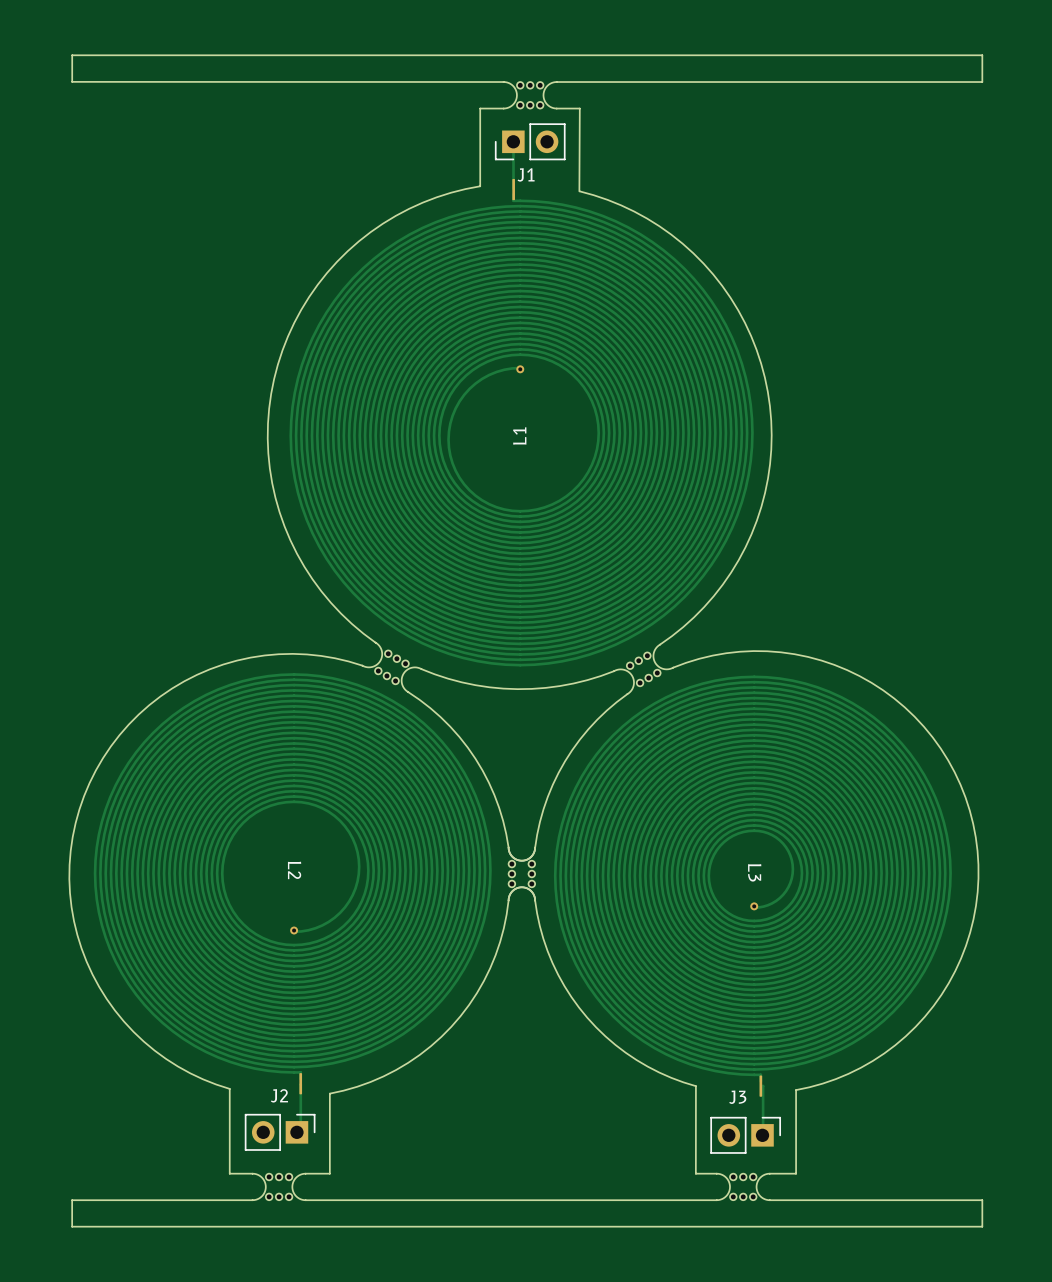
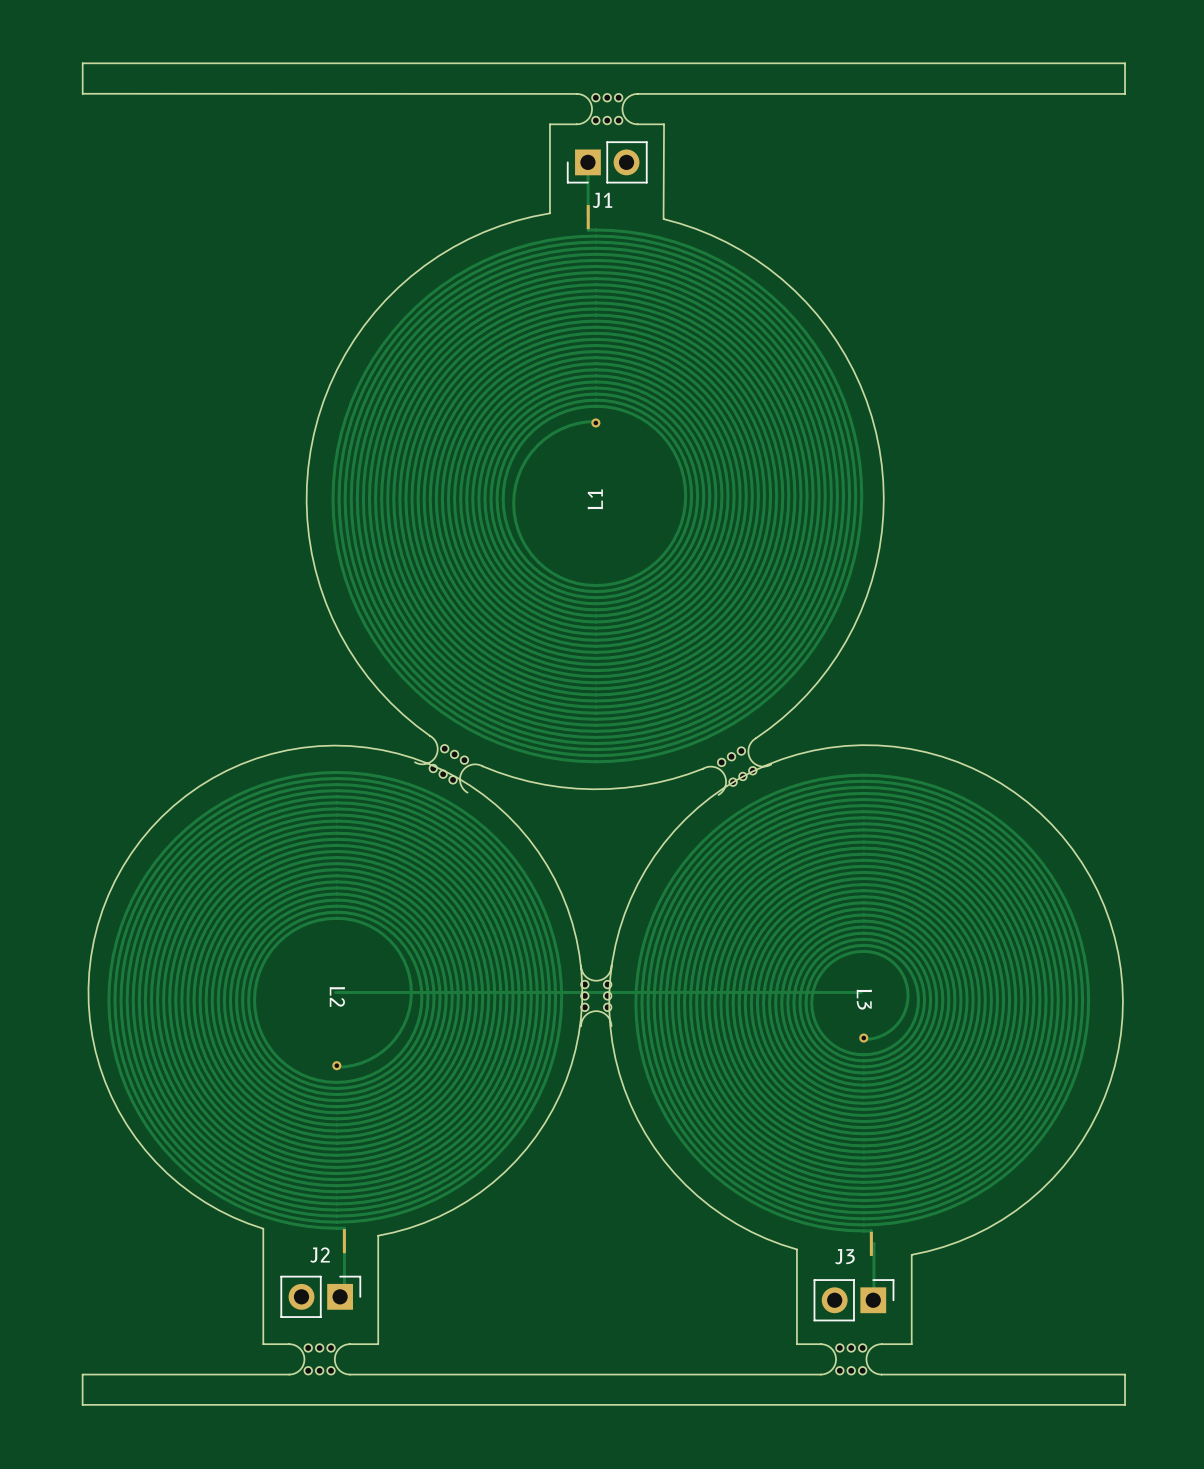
board edge: (362, 665) (321, 655) (278, 654) (250, 657) (223, 664) (184, 681) (149, 705) (119, 735) (103, 758) (89, 783) (75, 823) (69, 864) (70, 893) (74, 921) (86, 961) (106, 998) (123, 1021) (143, 1041) (177, 1066) (203, 1079) (229, 1088) (229, 1173) -> none
board edge: (673, 667) (712, 655) (739, 651) (767, 651) (794, 654) (821, 660) (859, 676) (894, 698) (914, 716) (932, 737) (954, 772) (969, 810) (977, 850) (978, 878) (976, 905) (966, 945) (948, 983) (924, 1016) (905, 1036) (884, 1053) (848, 1073) (822, 1083) (796, 1090) (796, 1095) -> (796, 1344) (796, 1249) (751, 1231) (723, 1215) (685, 1184) (654, 1147) (637, 1119) (619, 1074) (612, 1042) (609, 993) (612, 961) (624, 913) (637, 884) (664, 843) (697, 807) (723, 788) (766, 765) (813, 750) (861, 745) (910, 748) (957, 761) (1001, 783) (1027, 802) (1051, 824) (1081, 862) (1104, 906) (1118, 952) (1122, 1001) (1118, 1049) (1104, 1096) (1082, 1140) (1052, 1178) (1015, 1210) (973, 1235) (943, 1247) (911, 1254)
board edge: (408, 692) (430, 708) (450, 726) (475, 758) (488, 782) (499, 807) (509, 852) (515, 858) (521, 860) (528, 859) (534, 852) (543, 809) (552, 784) (565, 761) (588, 729) (606, 710) (627, 694) -> none
part footprint: [507, 846, 536, 902] -> [580, 964, 613, 1028]
track: none -> (335, 992) (861, 992)
board edge: (329, 1173) (329, 1093) (370, 1082) (396, 1070) (419, 1054) (451, 1026) (469, 1004) (483, 980) (500, 941) (509, 895) (515, 889) (521, 887) (528, 889) (533, 893) (539, 926) (552, 963) (571, 997) (587, 1017) (605, 1036) (636, 1060) (659, 1072) (695, 1086) (695, 1173) -> (377, 1344) (378, 1235) (424, 1222) (466, 1201) (504, 1172) (536, 1136) (560, 1094) (571, 1065) (580, 1018) (581, 970) (572, 923) (554, 879) (528, 839) (495, 804) (456, 777) (412, 758) (366, 747) (334, 745) (286, 750) (241, 764) (199, 786) (173, 805) (150, 828) (122, 866) (102, 910) (91, 956) (88, 988) (92, 1035) (105, 1081) (126, 1124) (156, 1162) (192, 1193) (233, 1217) (263, 1228) (263, 1344)

